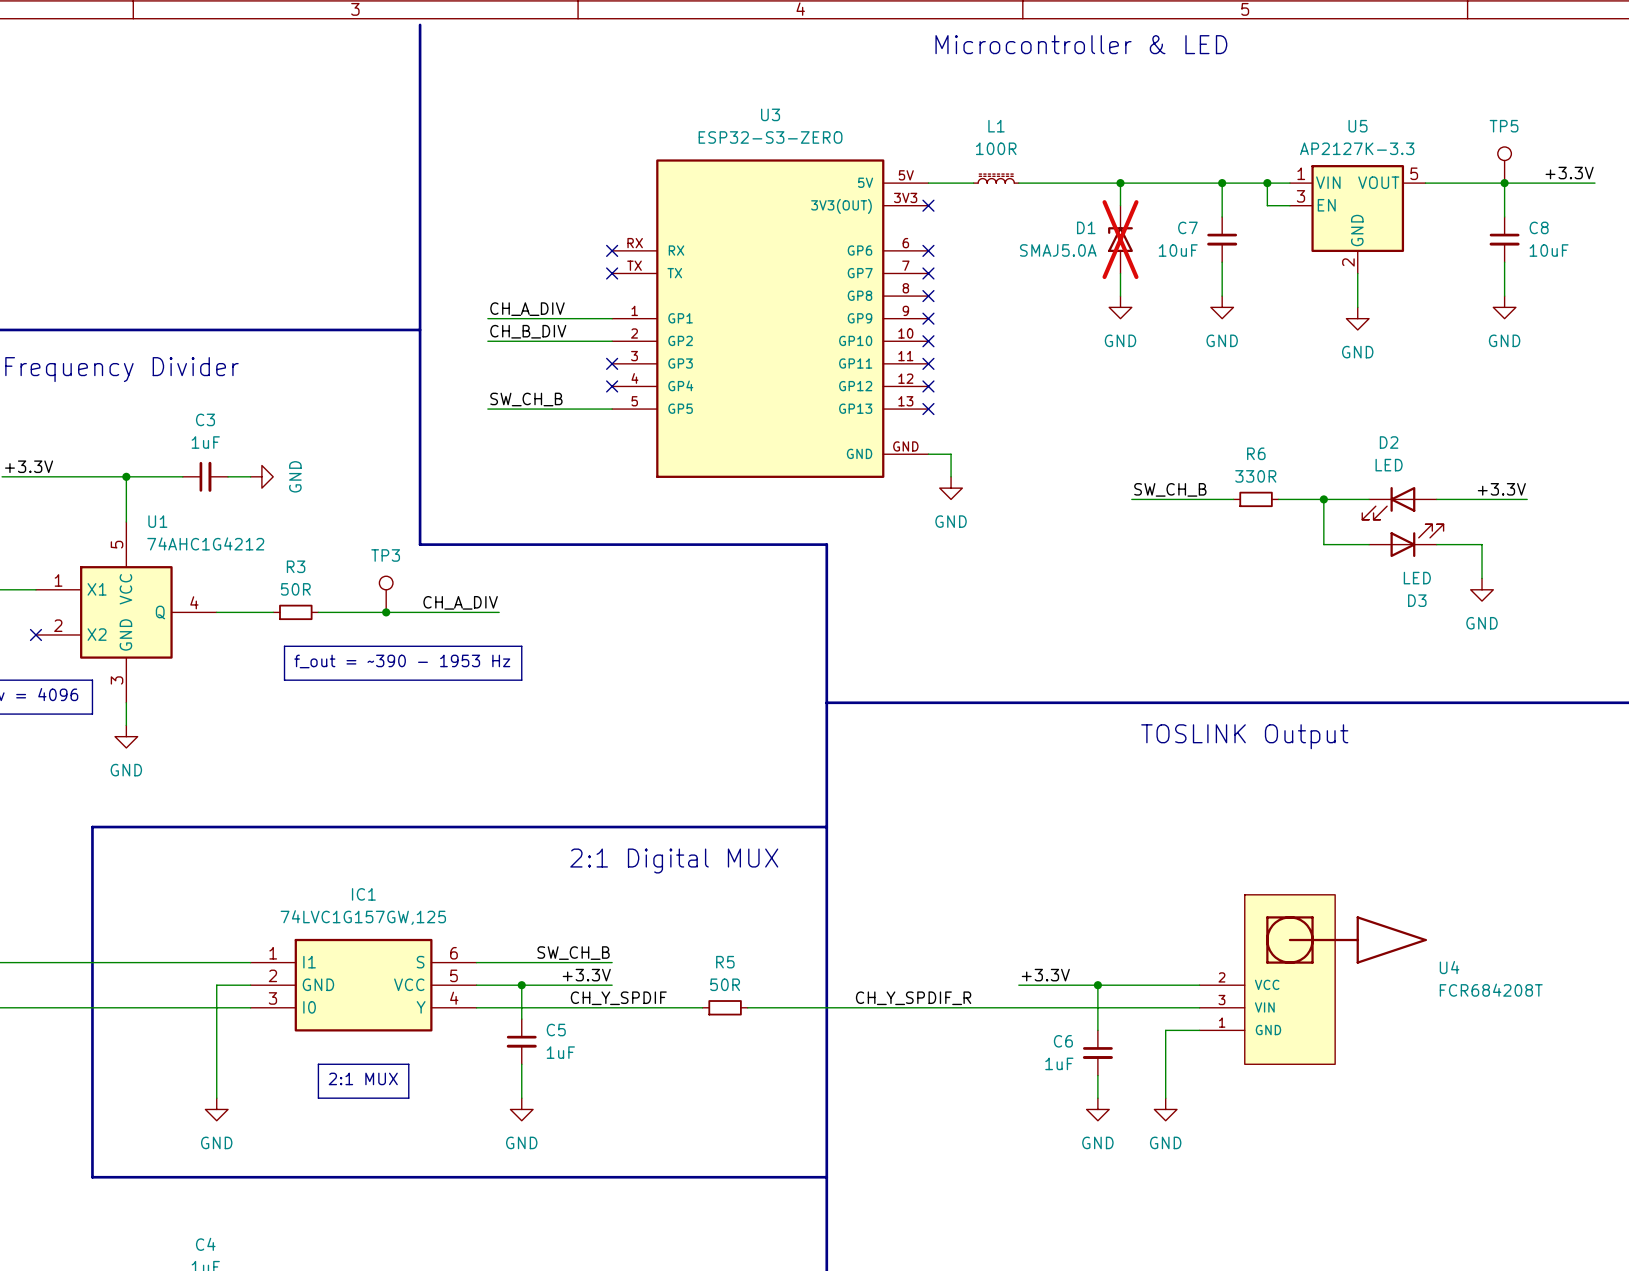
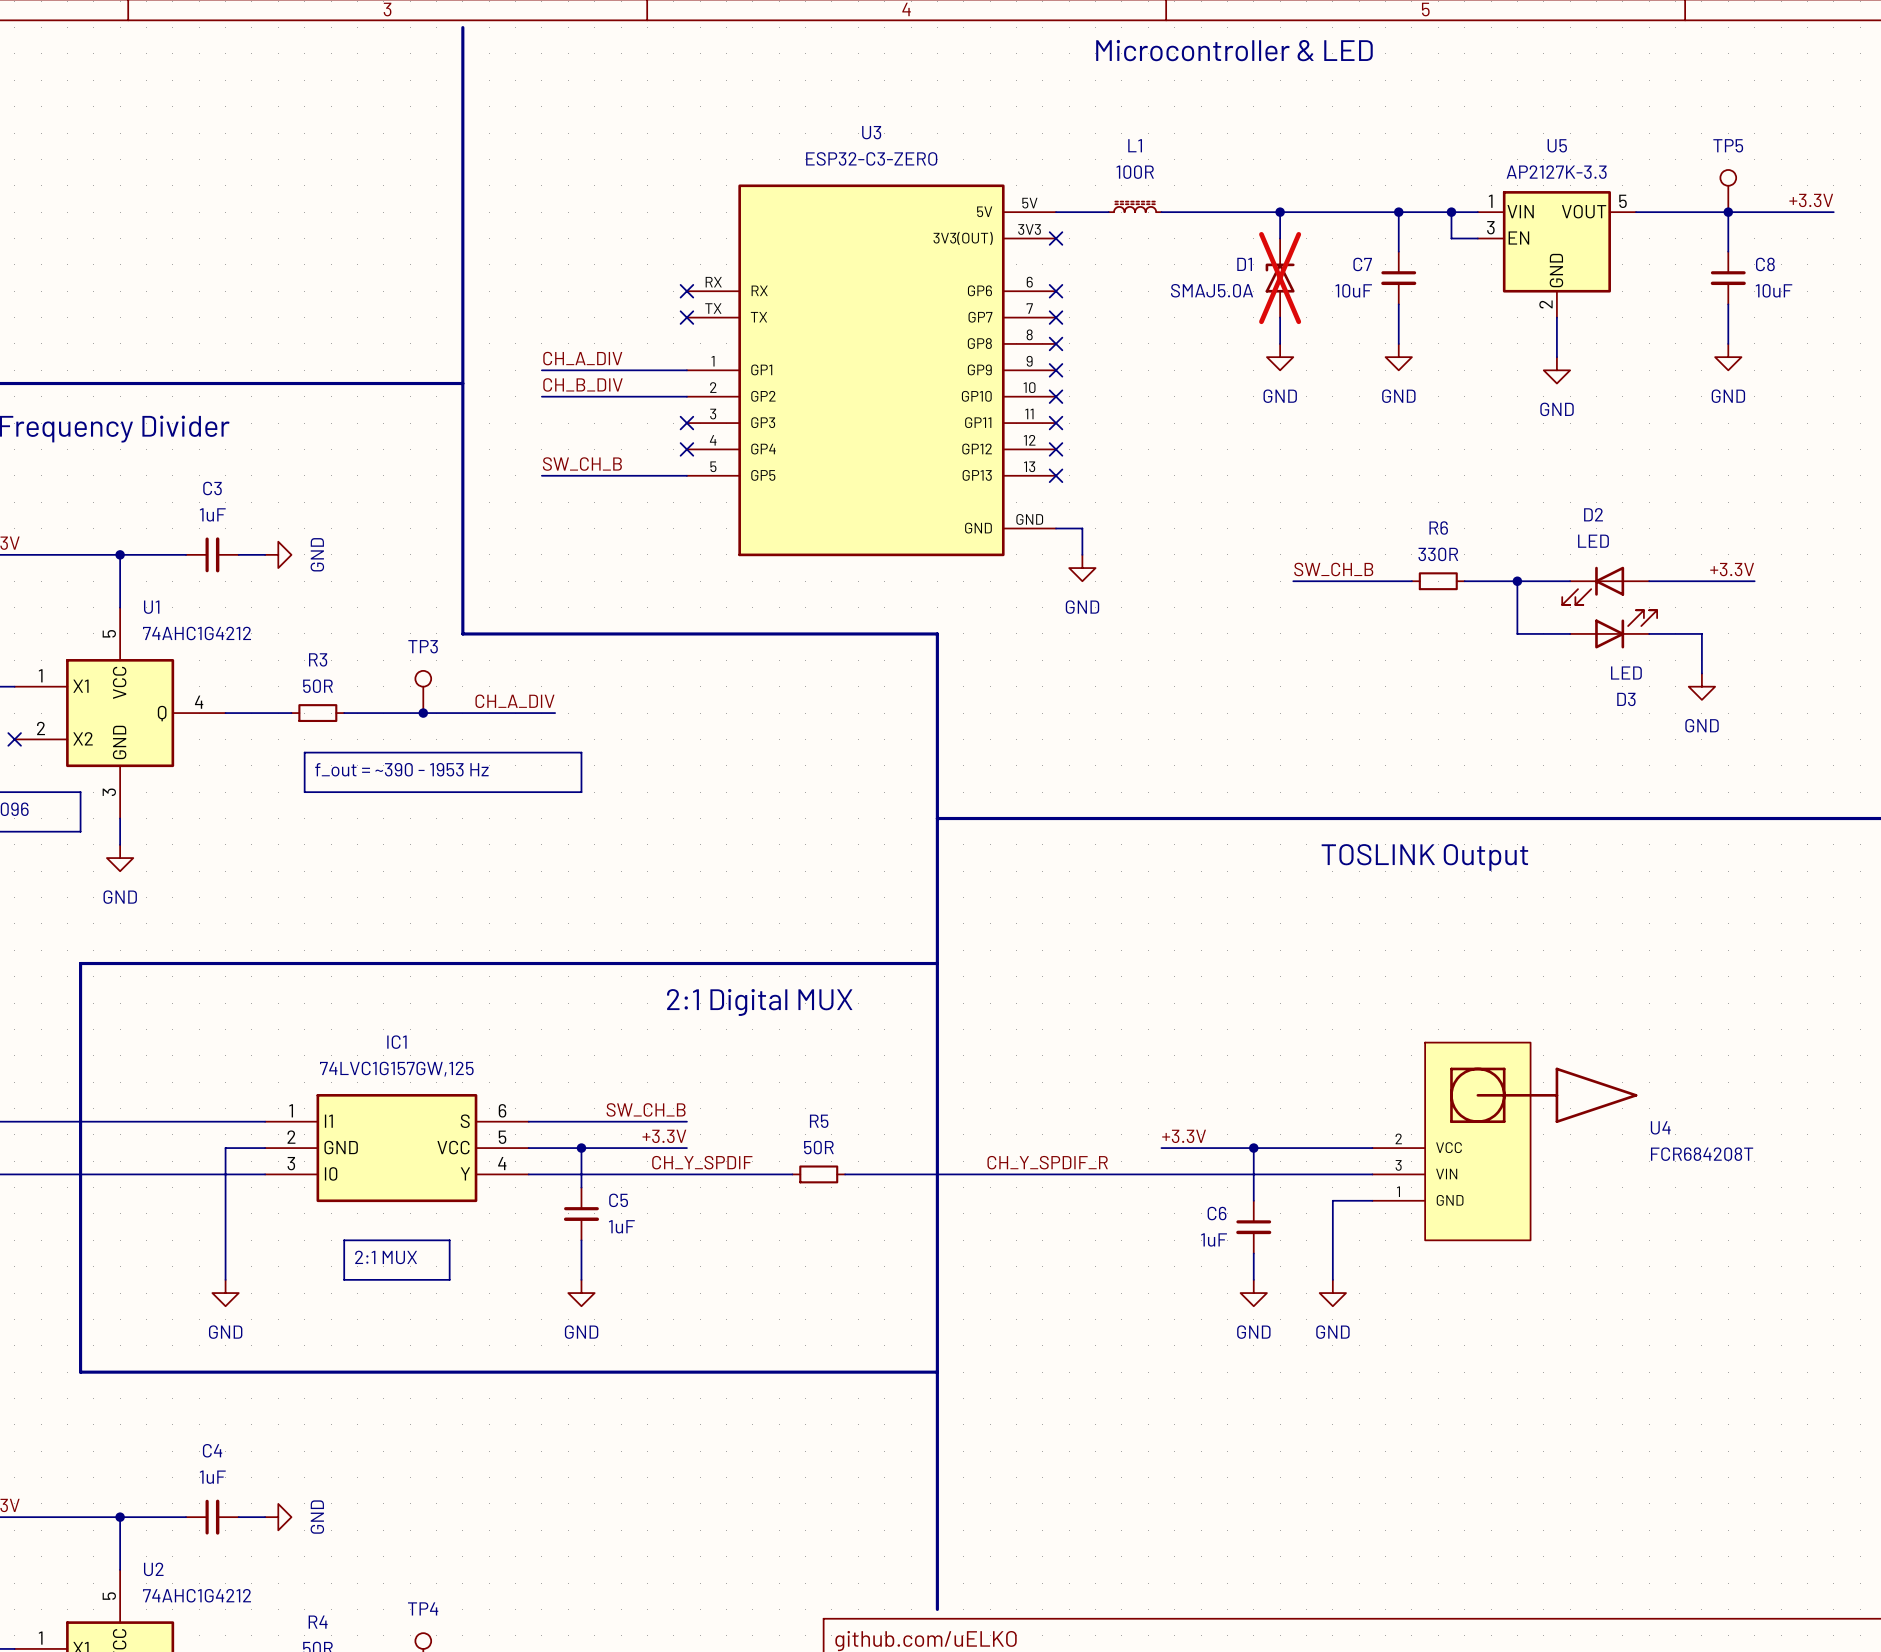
U3 value: ESP32-S3-ZERO (770, 137) -> ESP32-C3-ZERO (871, 158)

